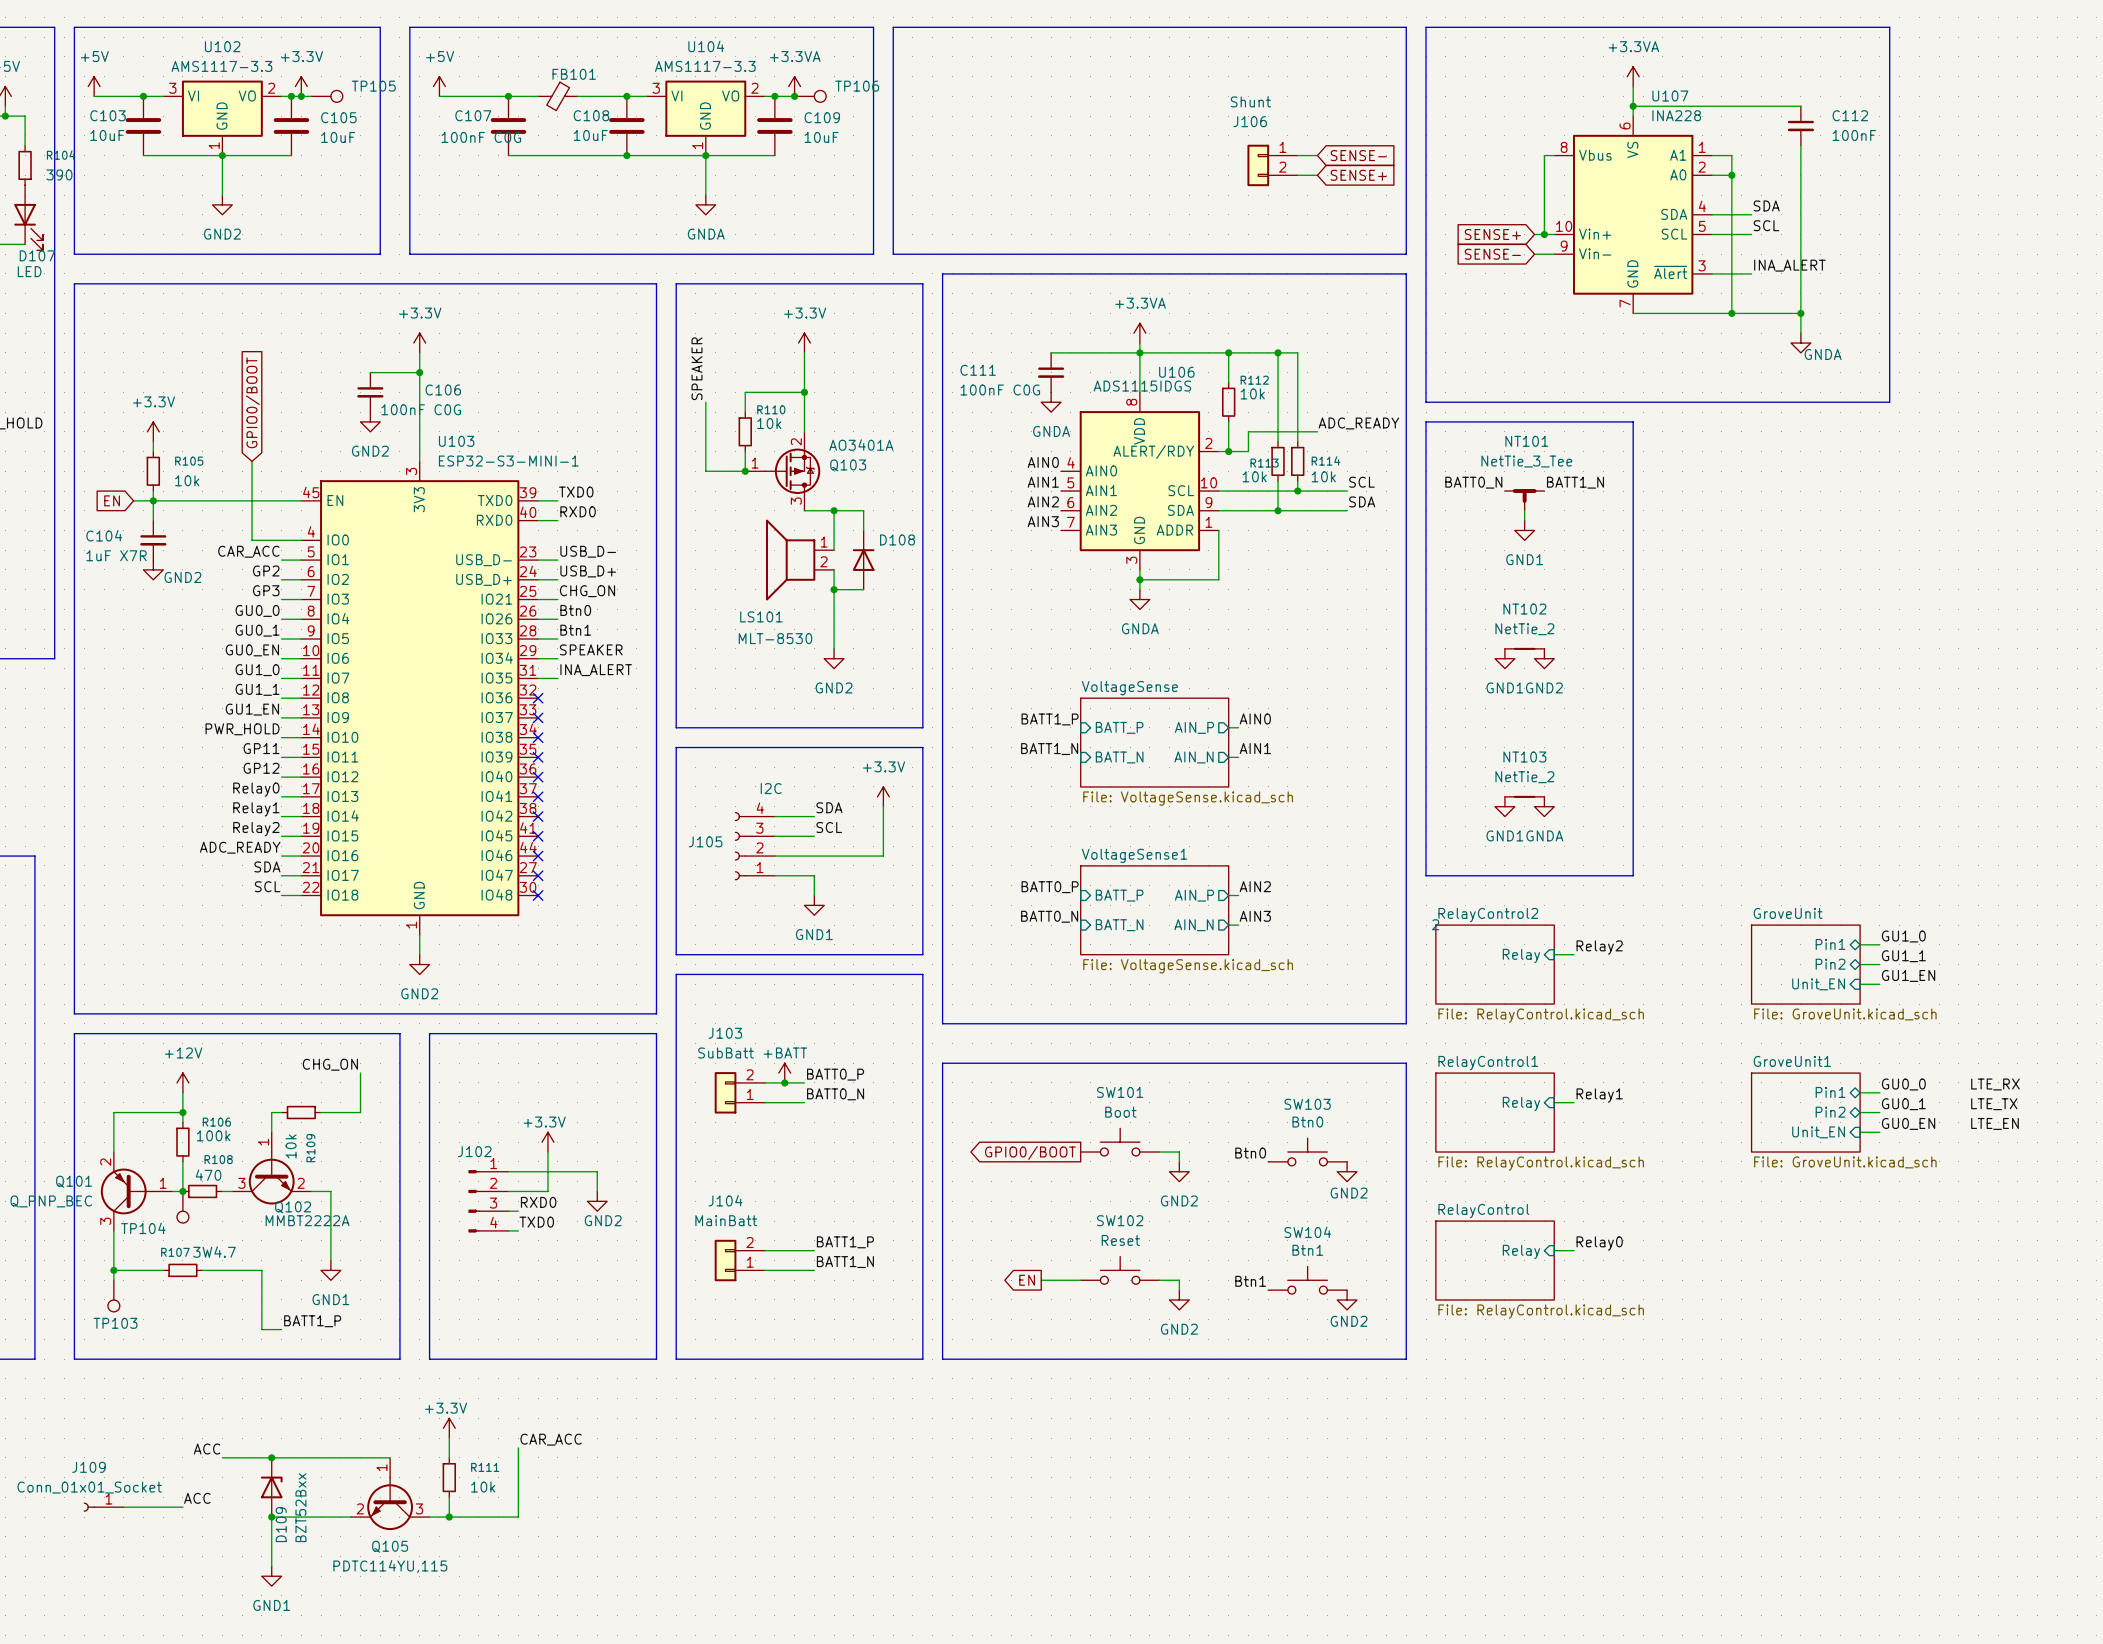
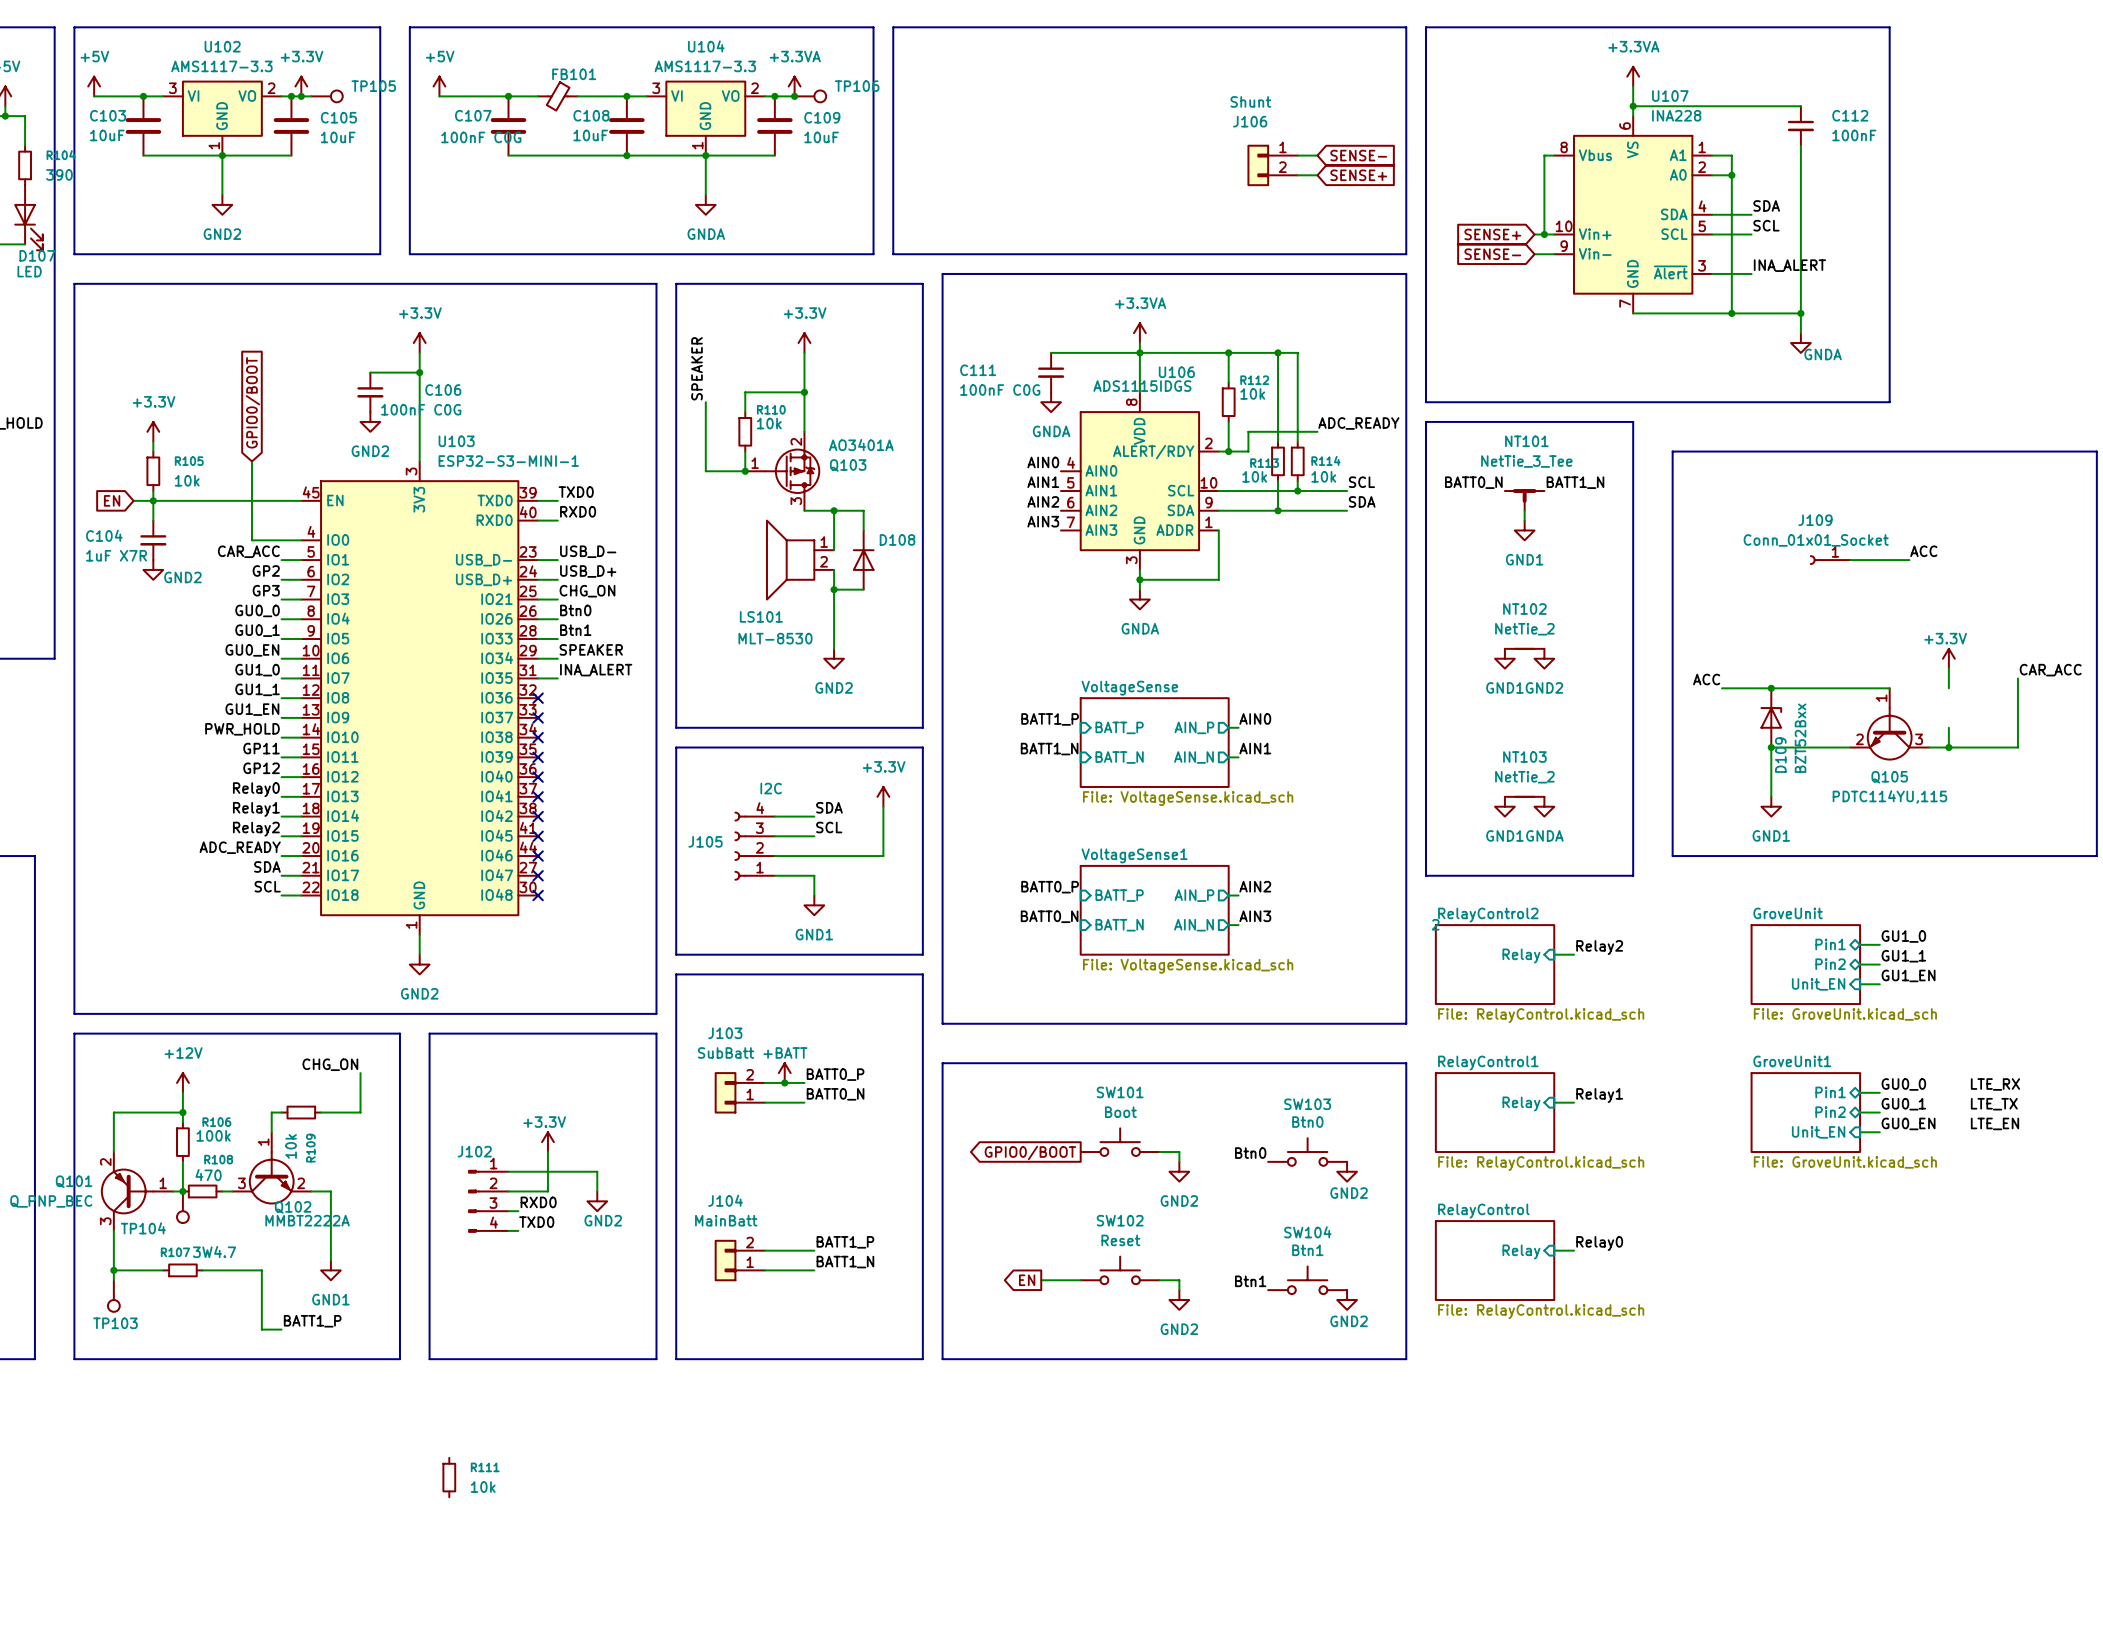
line: none -> (1672, 451) (2096, 451) (2096, 856) (1672, 856) (1672, 451)
label: none -> ACC (1923, 551)
wire: none -> (1850, 560) (1909, 560)
power symbol: none -> +3.3V (1948, 658)
wire: none -> (1948, 668) (1948, 688)
label: none -> CAR_ACC (2050, 670)
wire: none -> (2017, 678) (2017, 747) (1929, 747)
label: none -> ACC (1706, 679)
wire: none -> (1721, 688) (1889, 688)
junction: none -> (1771, 688)
wire: none -> (1948, 727) (1948, 747)
junction: none -> (1771, 747)
wire: none -> (1850, 747) (1771, 747) (1771, 796)
junction: none -> (1948, 747)
power symbol: none -> GND1 (1771, 806)
power symbol: +3.3V (449, 1428) -> none
wire: (449, 1438) (449, 1457) -> none
label: CAR_ACC (551, 1439) -> none
wire: (518, 1447) (518, 1517) (429, 1517) -> none
label: ACC (207, 1449) -> none
wire: (222, 1457) (390, 1457) -> none
junction: (271, 1457) -> none
D109 position: (271, 1487) -> (1771, 717)
Q105 position: (390, 1493) -> (1889, 724)
wire: (449, 1497) (449, 1517) -> none
label: ACC (197, 1498) -> none
J109 position: (103, 1507) -> (1830, 560)
wire: (123, 1507) (182, 1507) -> none
junction: (271, 1517) -> none
wire: (350, 1517) (271, 1517) (271, 1566) -> none
junction: (449, 1517) -> none
power symbol: GND1 (271, 1576) -> none

